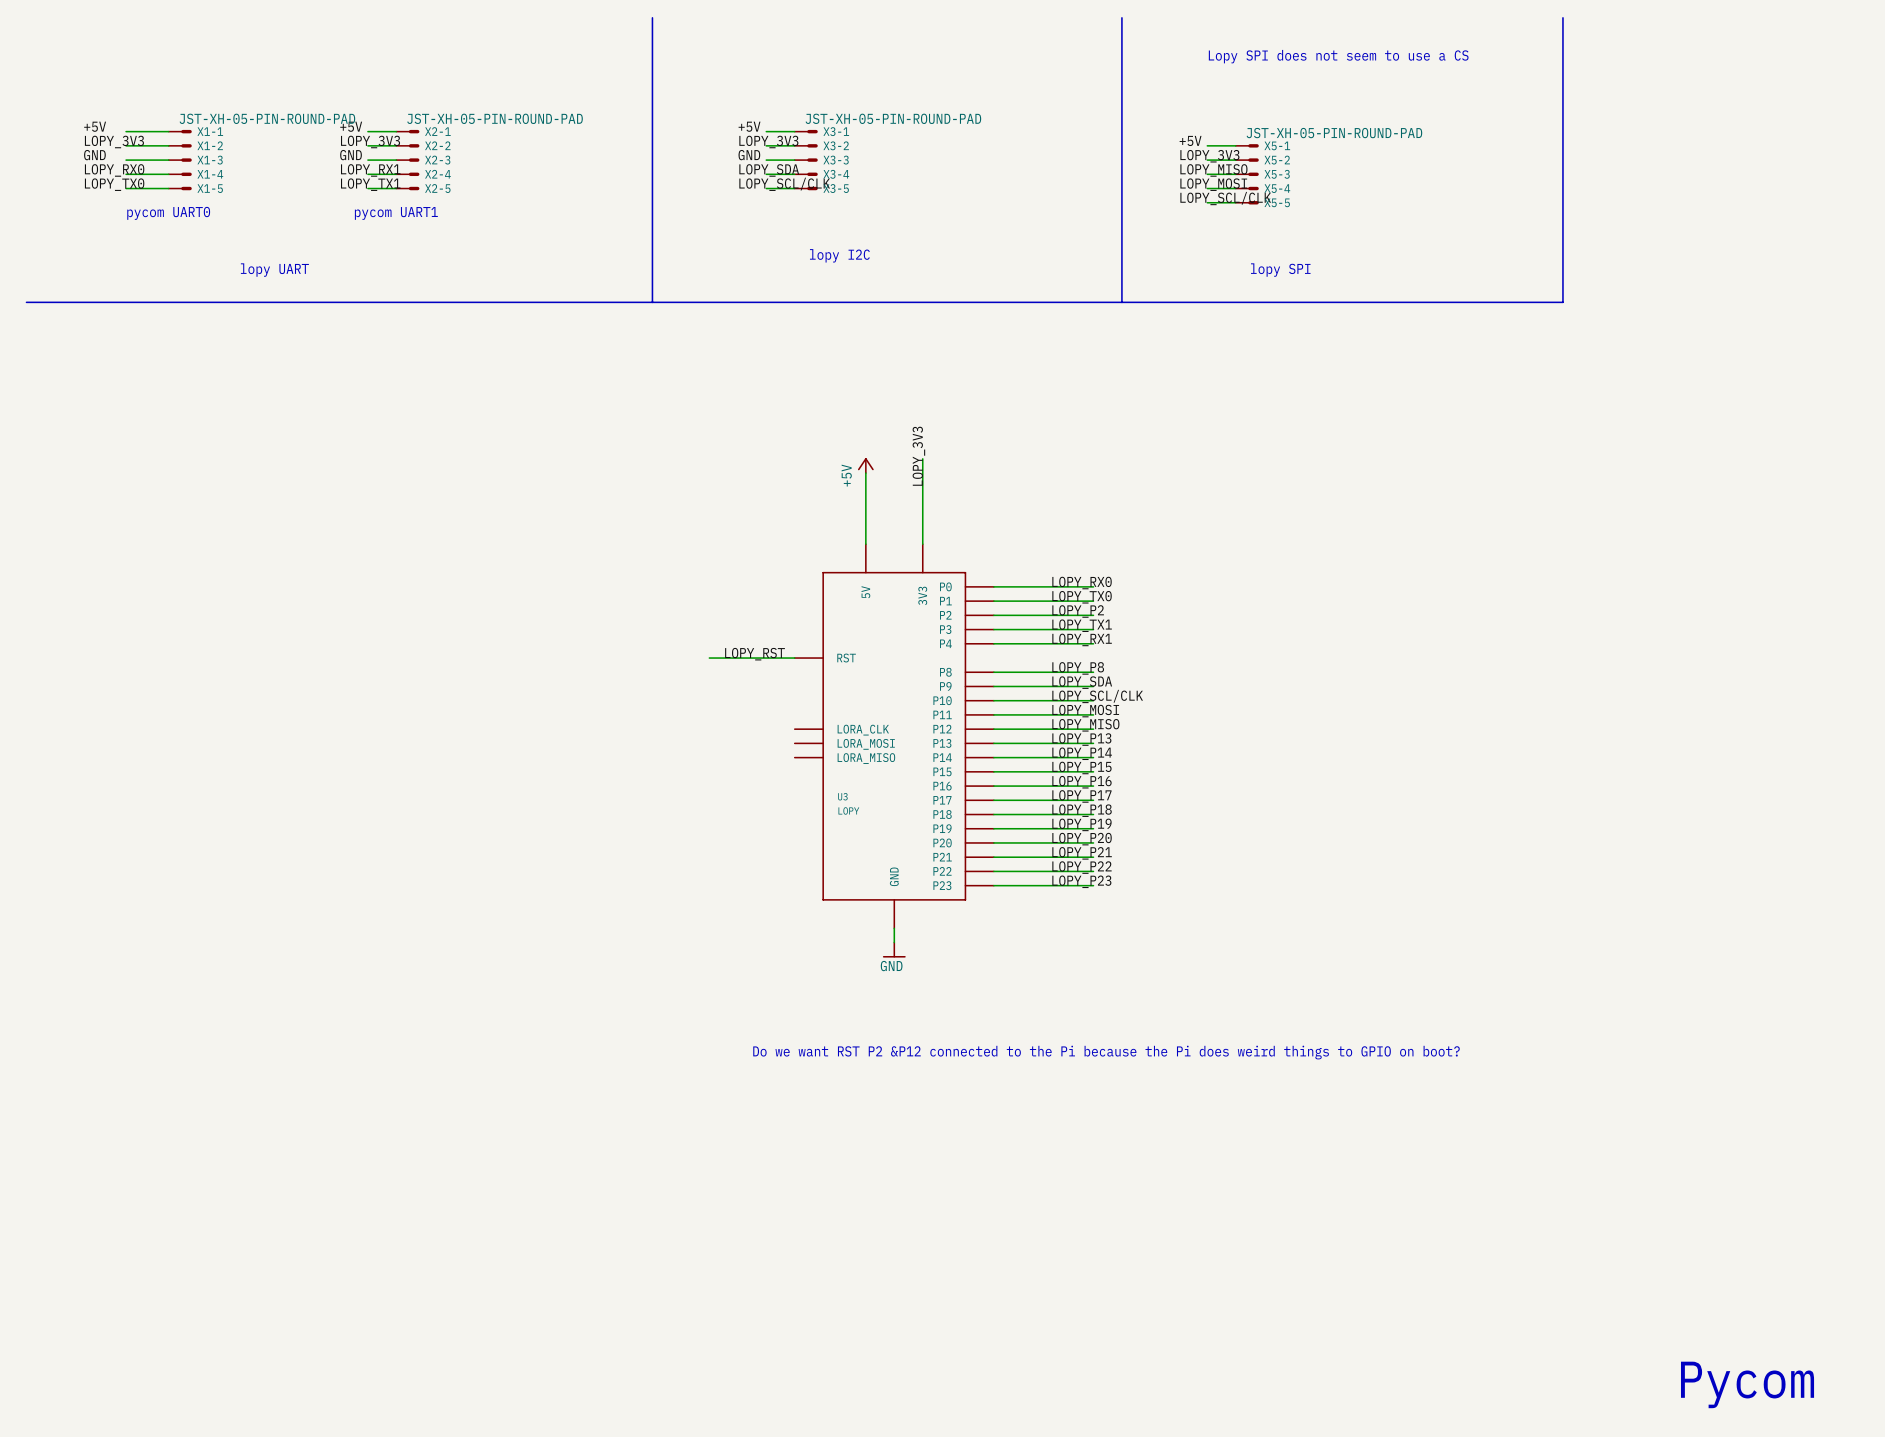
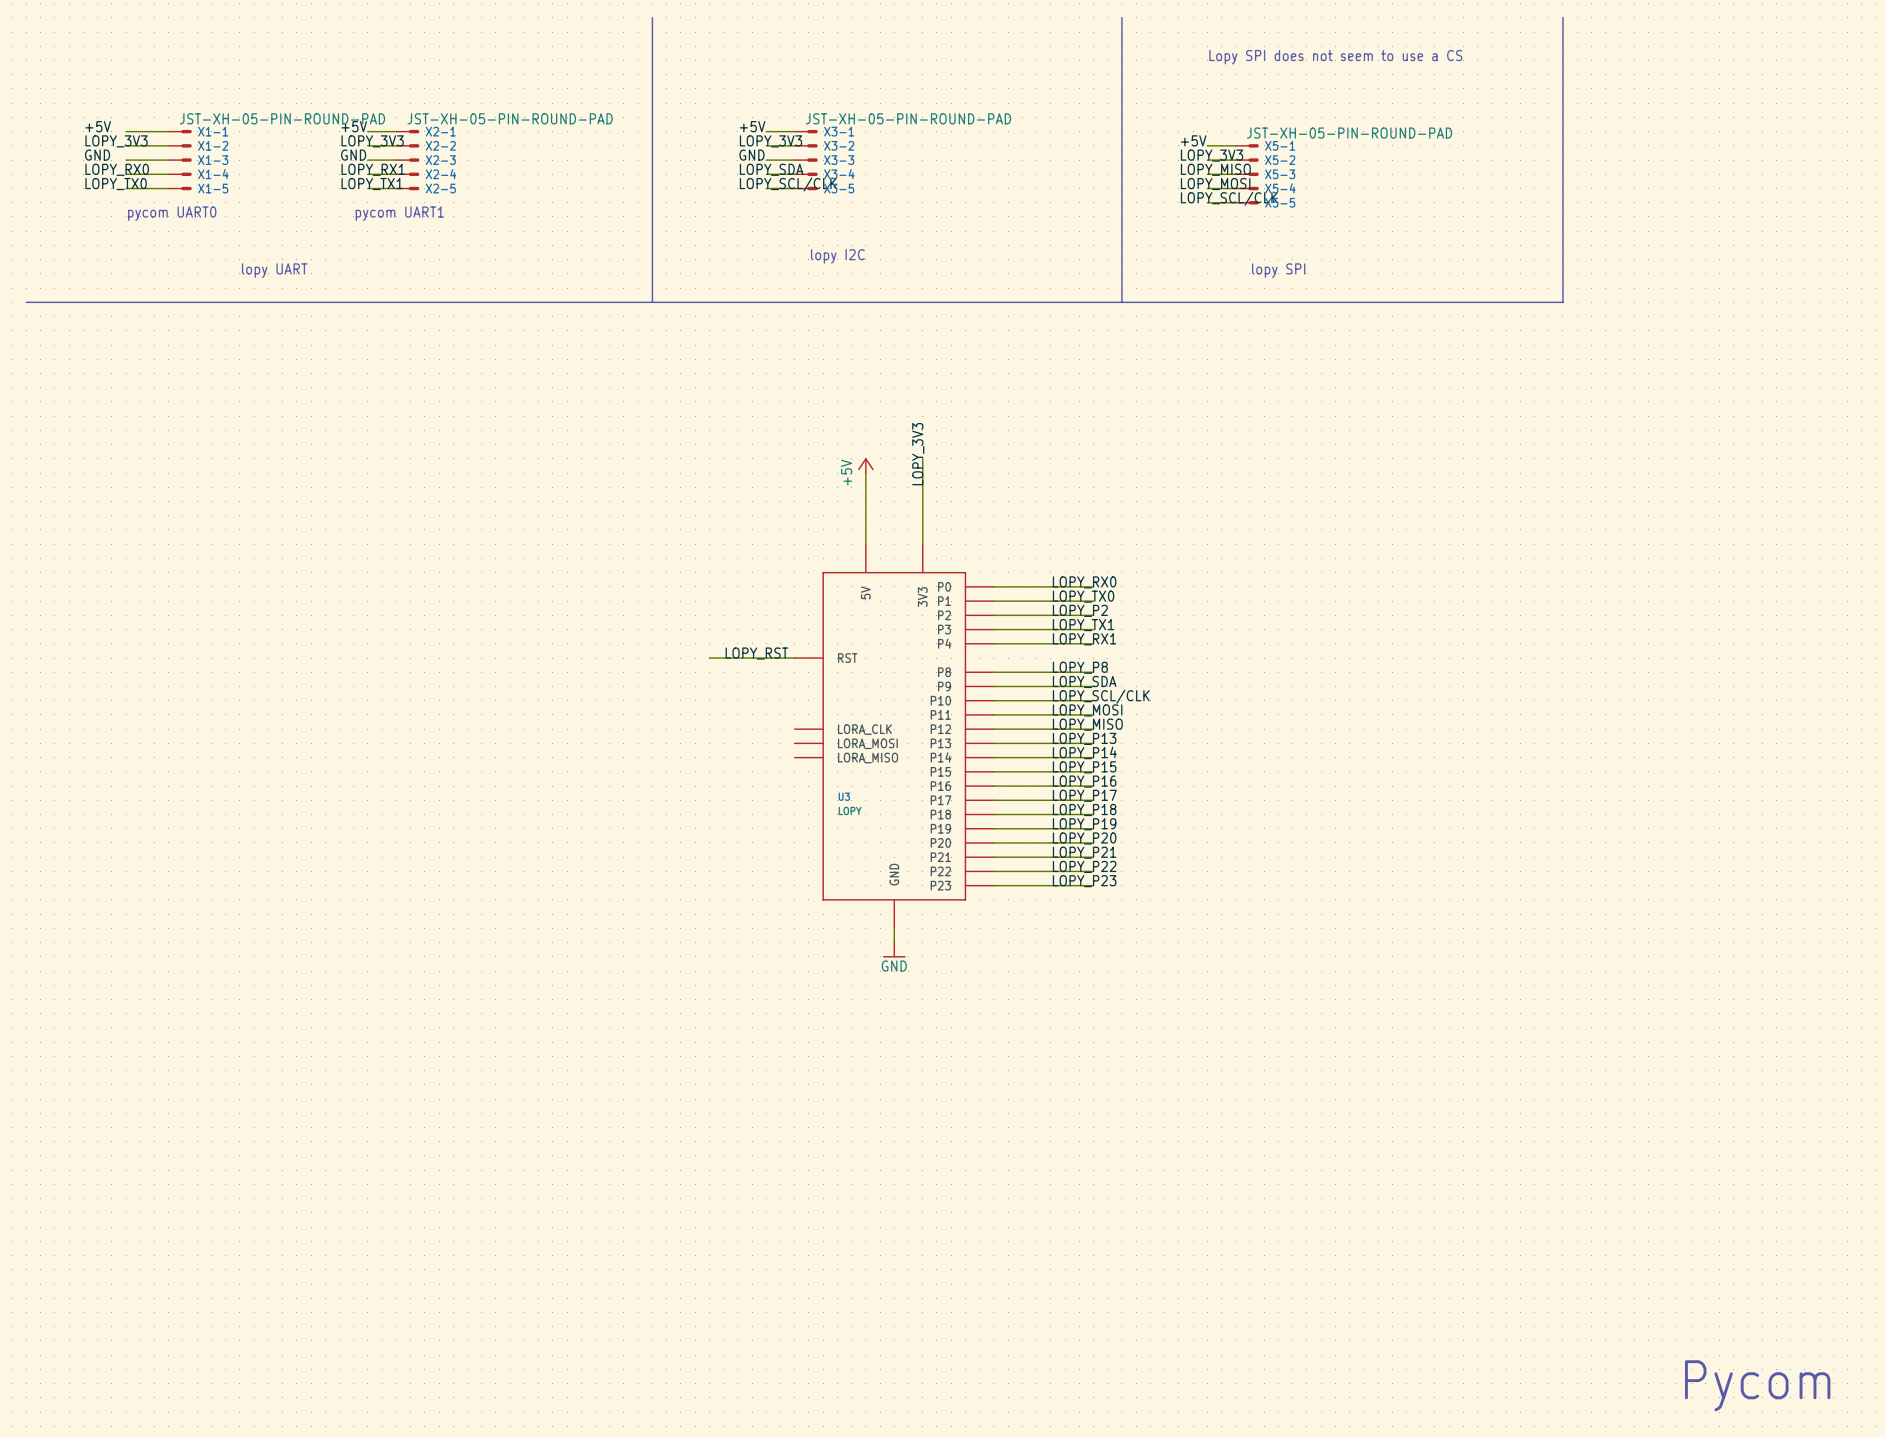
text: Do we want RST P2 &P12 connected to the Pi because the Pi does weird things to GPIO on boot? (1106, 1052) -> none

